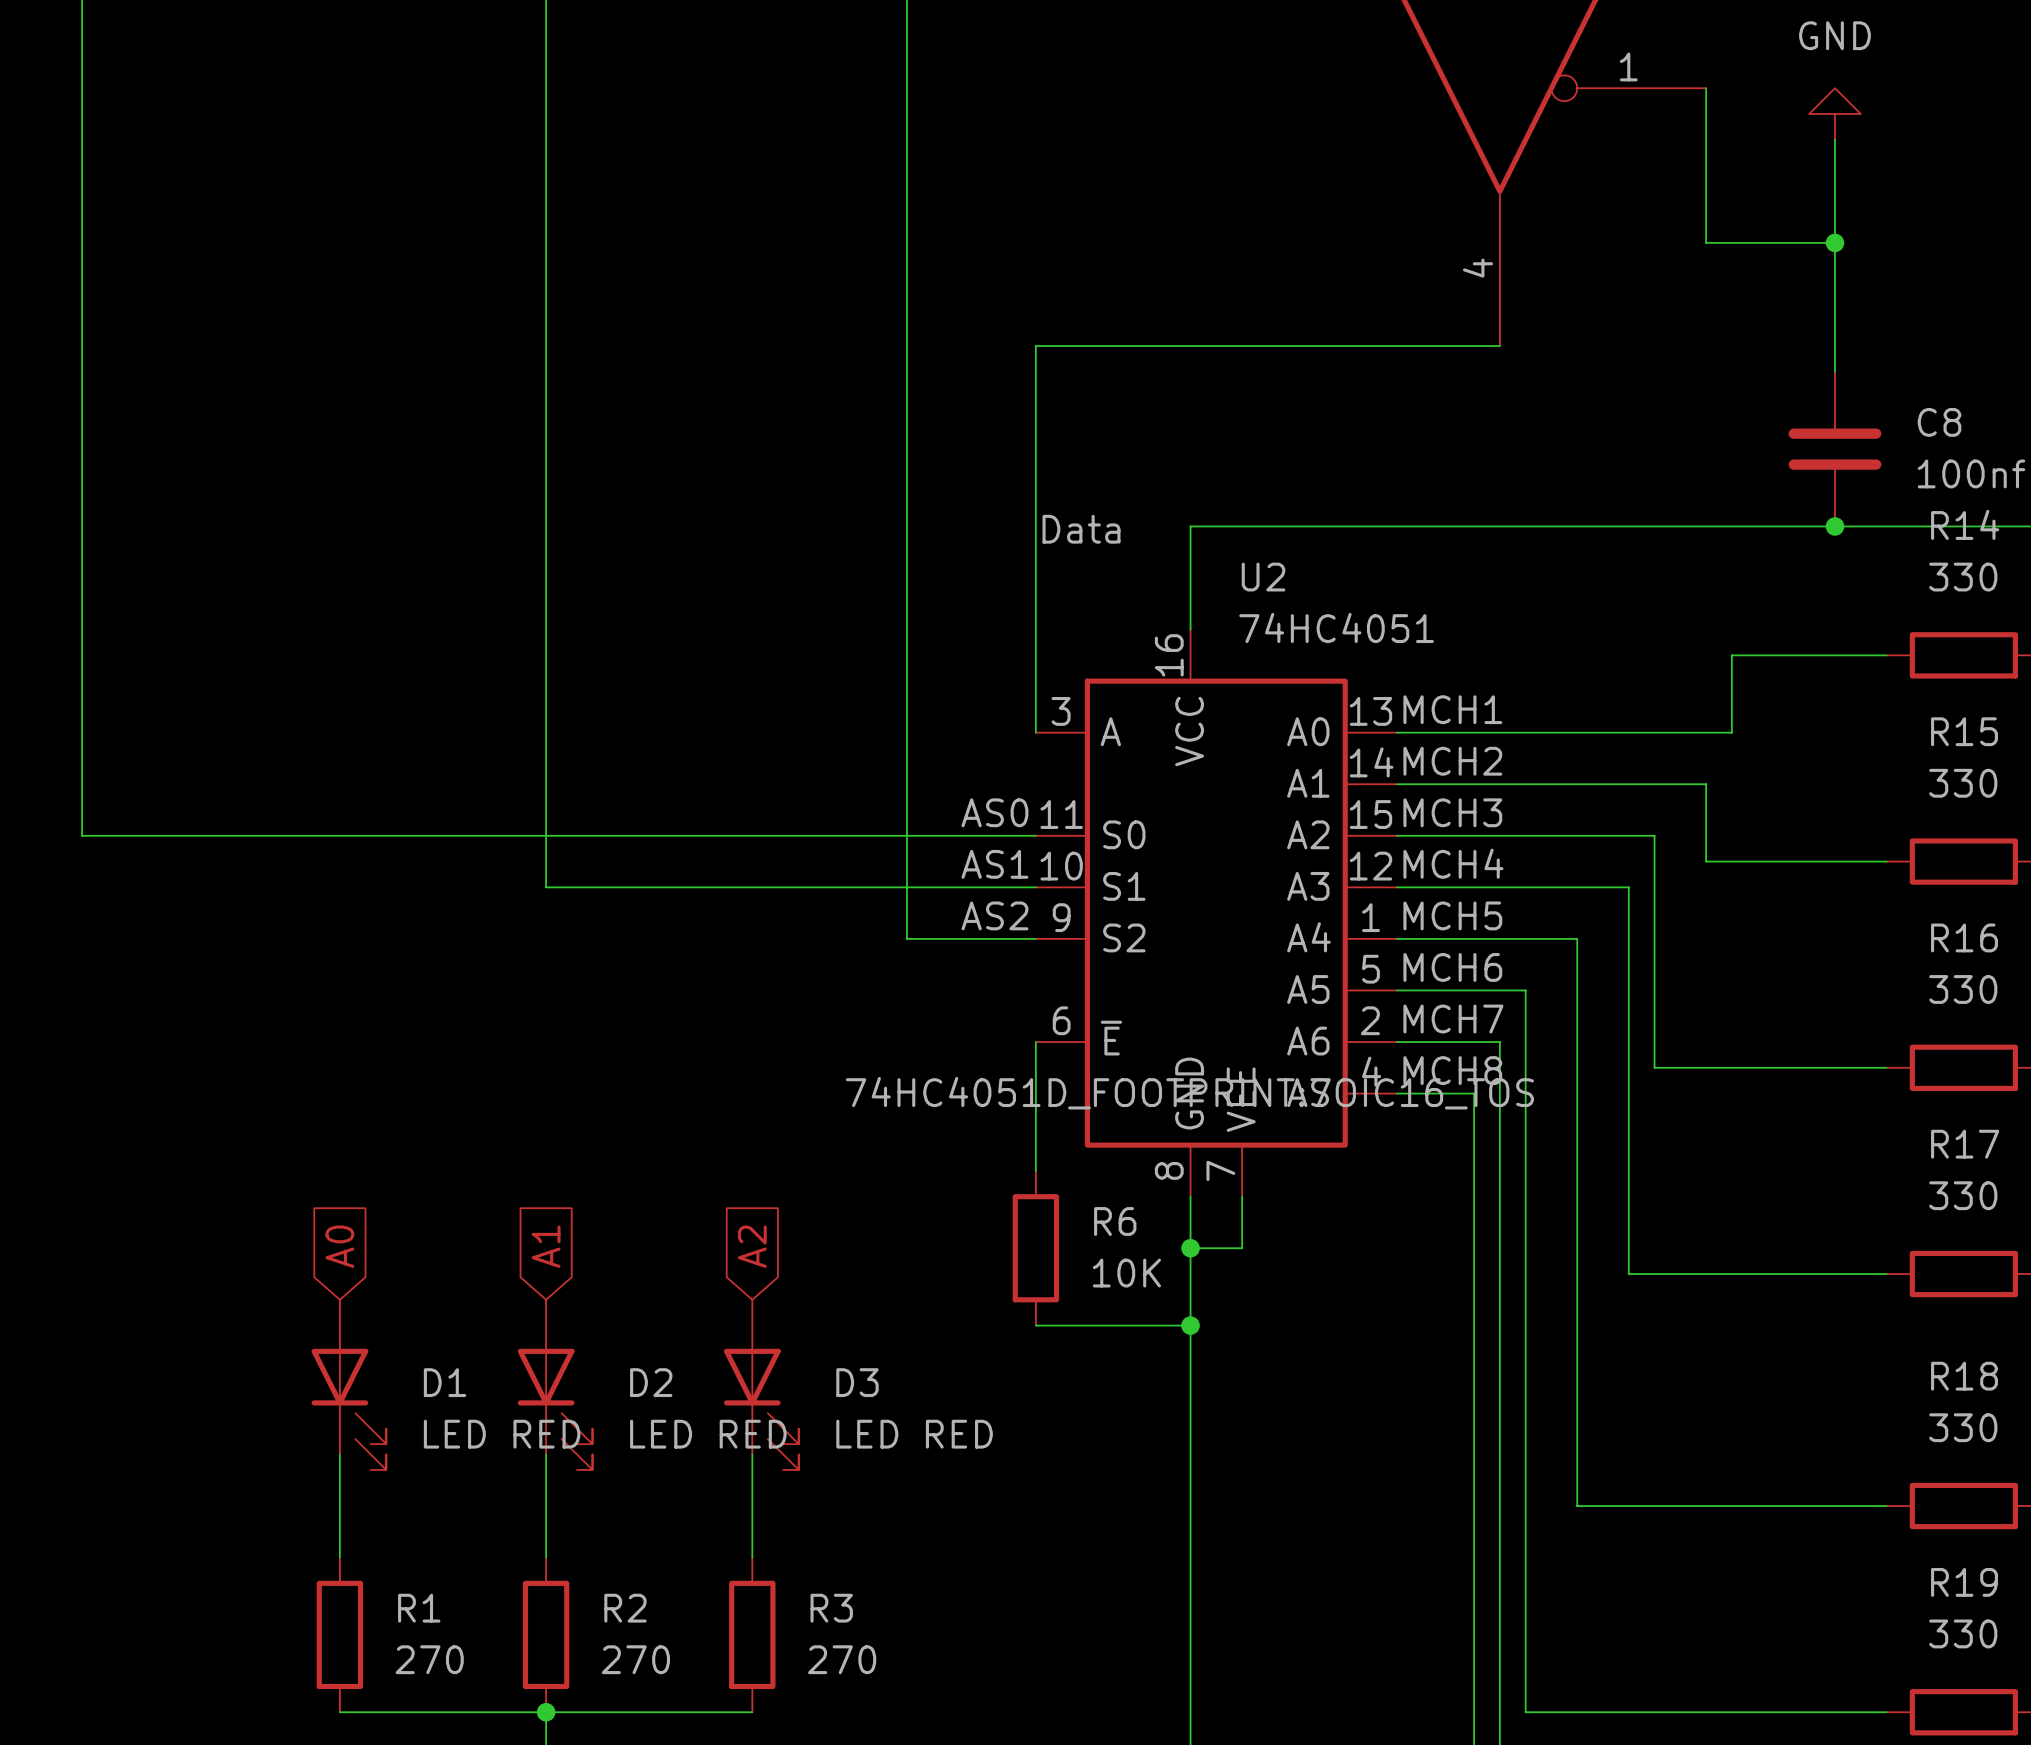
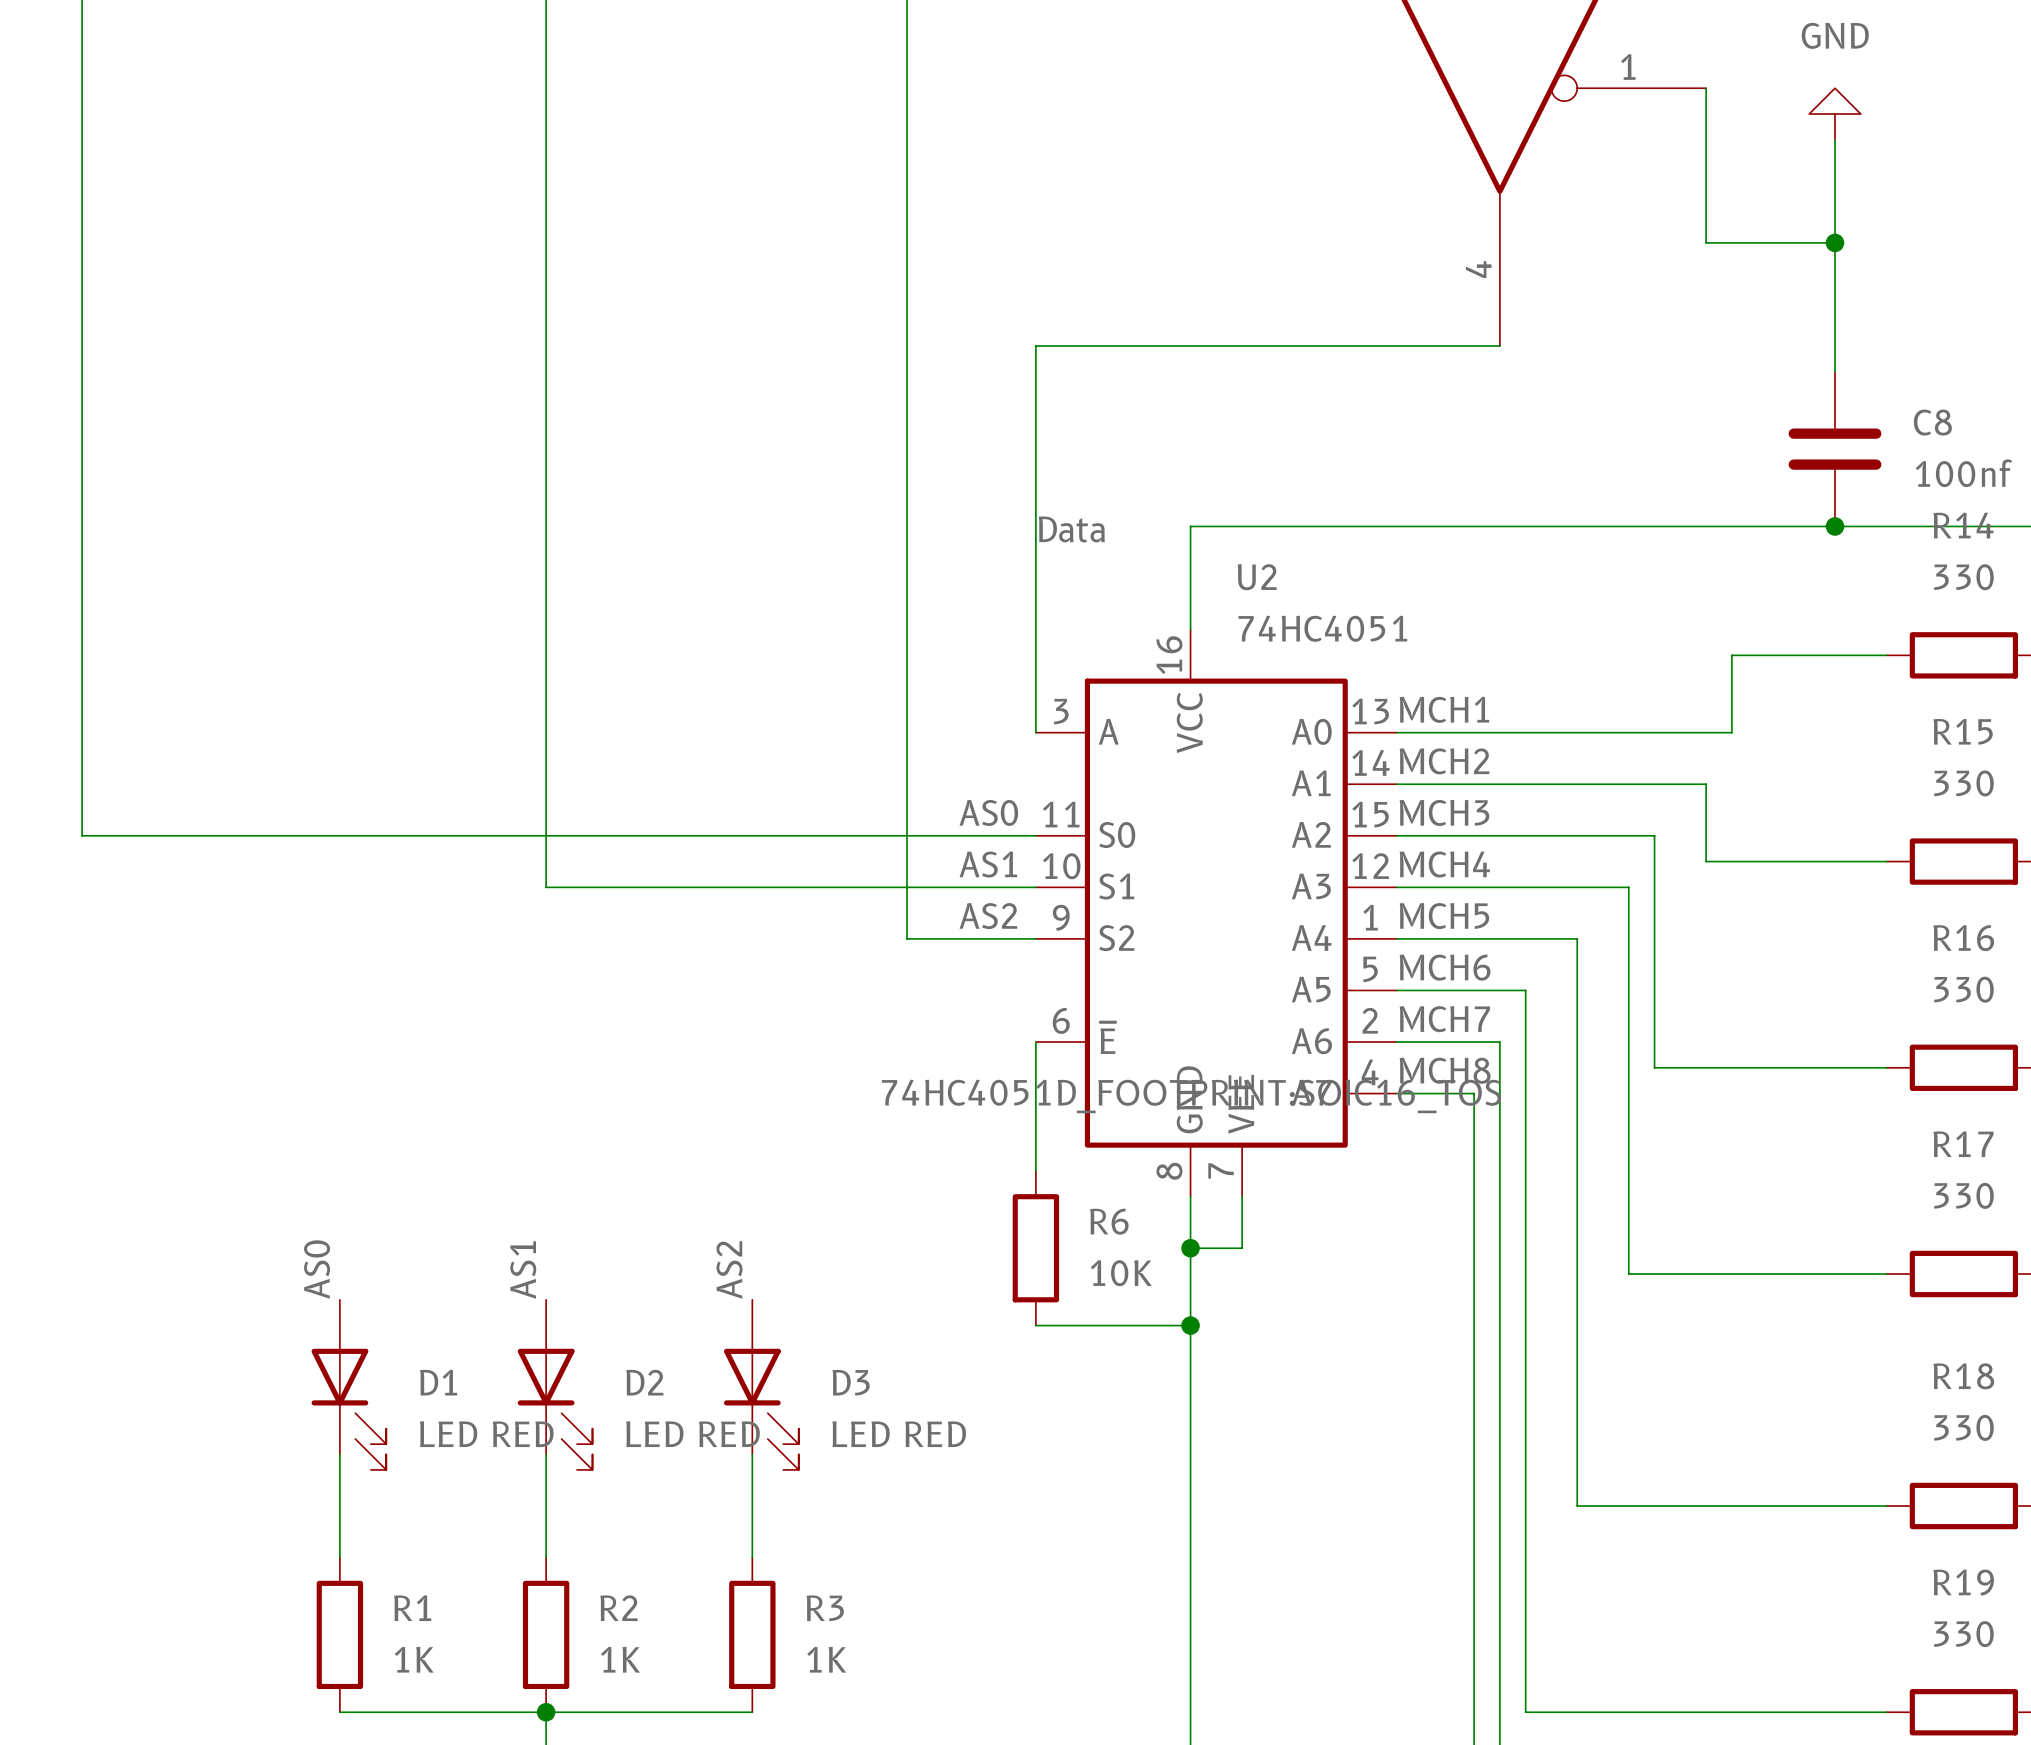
global label: A0 (339, 1246) -> none
global label: A1 (546, 1246) -> none
global label: A2 (752, 1246) -> none
label: none -> AS0 (317, 1269)
label: none -> AS1 (523, 1270)
label: none -> AS2 (729, 1269)
R1 value: 270 (429, 1659) -> 1K (414, 1659)
R2 value: 270 (635, 1659) -> 1K (620, 1659)
R3 value: 270 (842, 1659) -> 1K (826, 1659)

